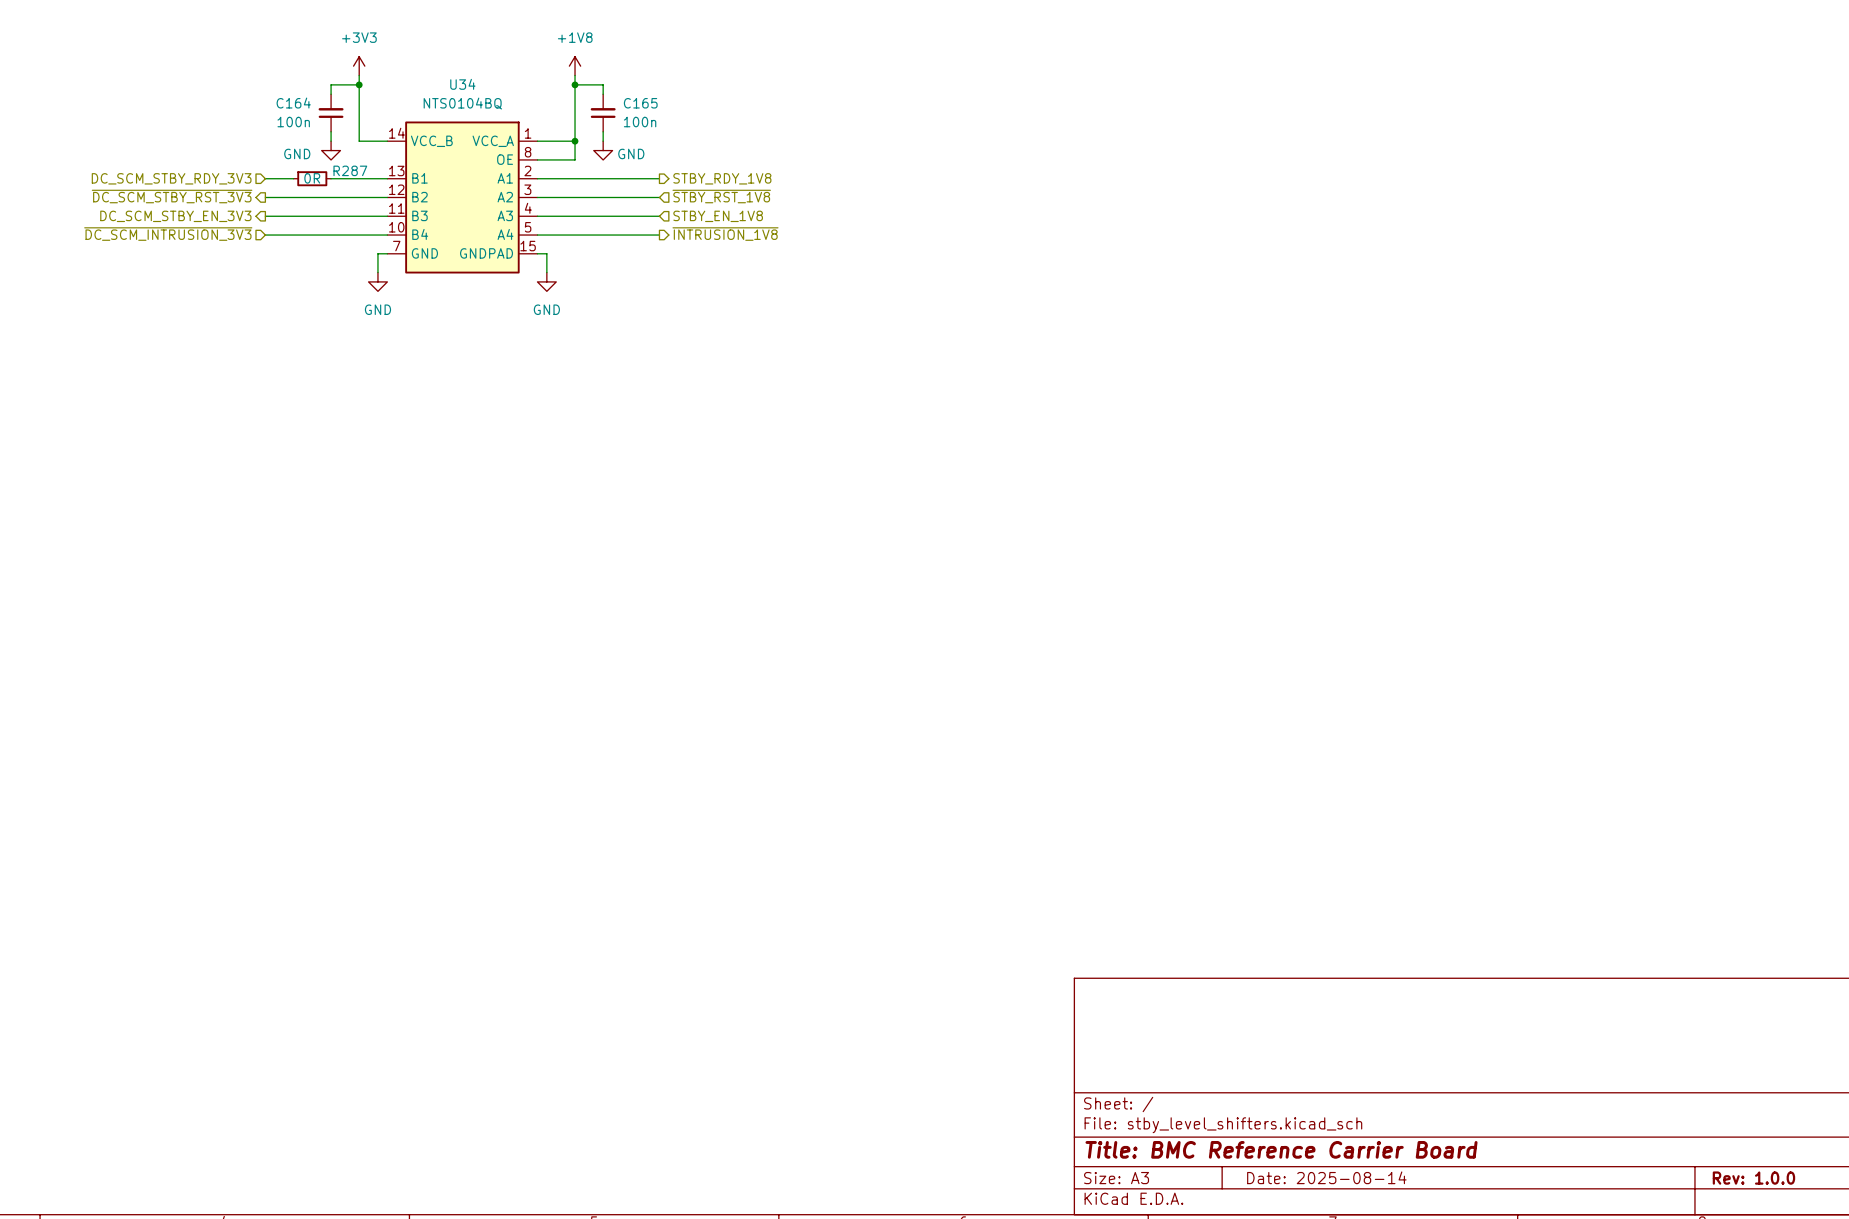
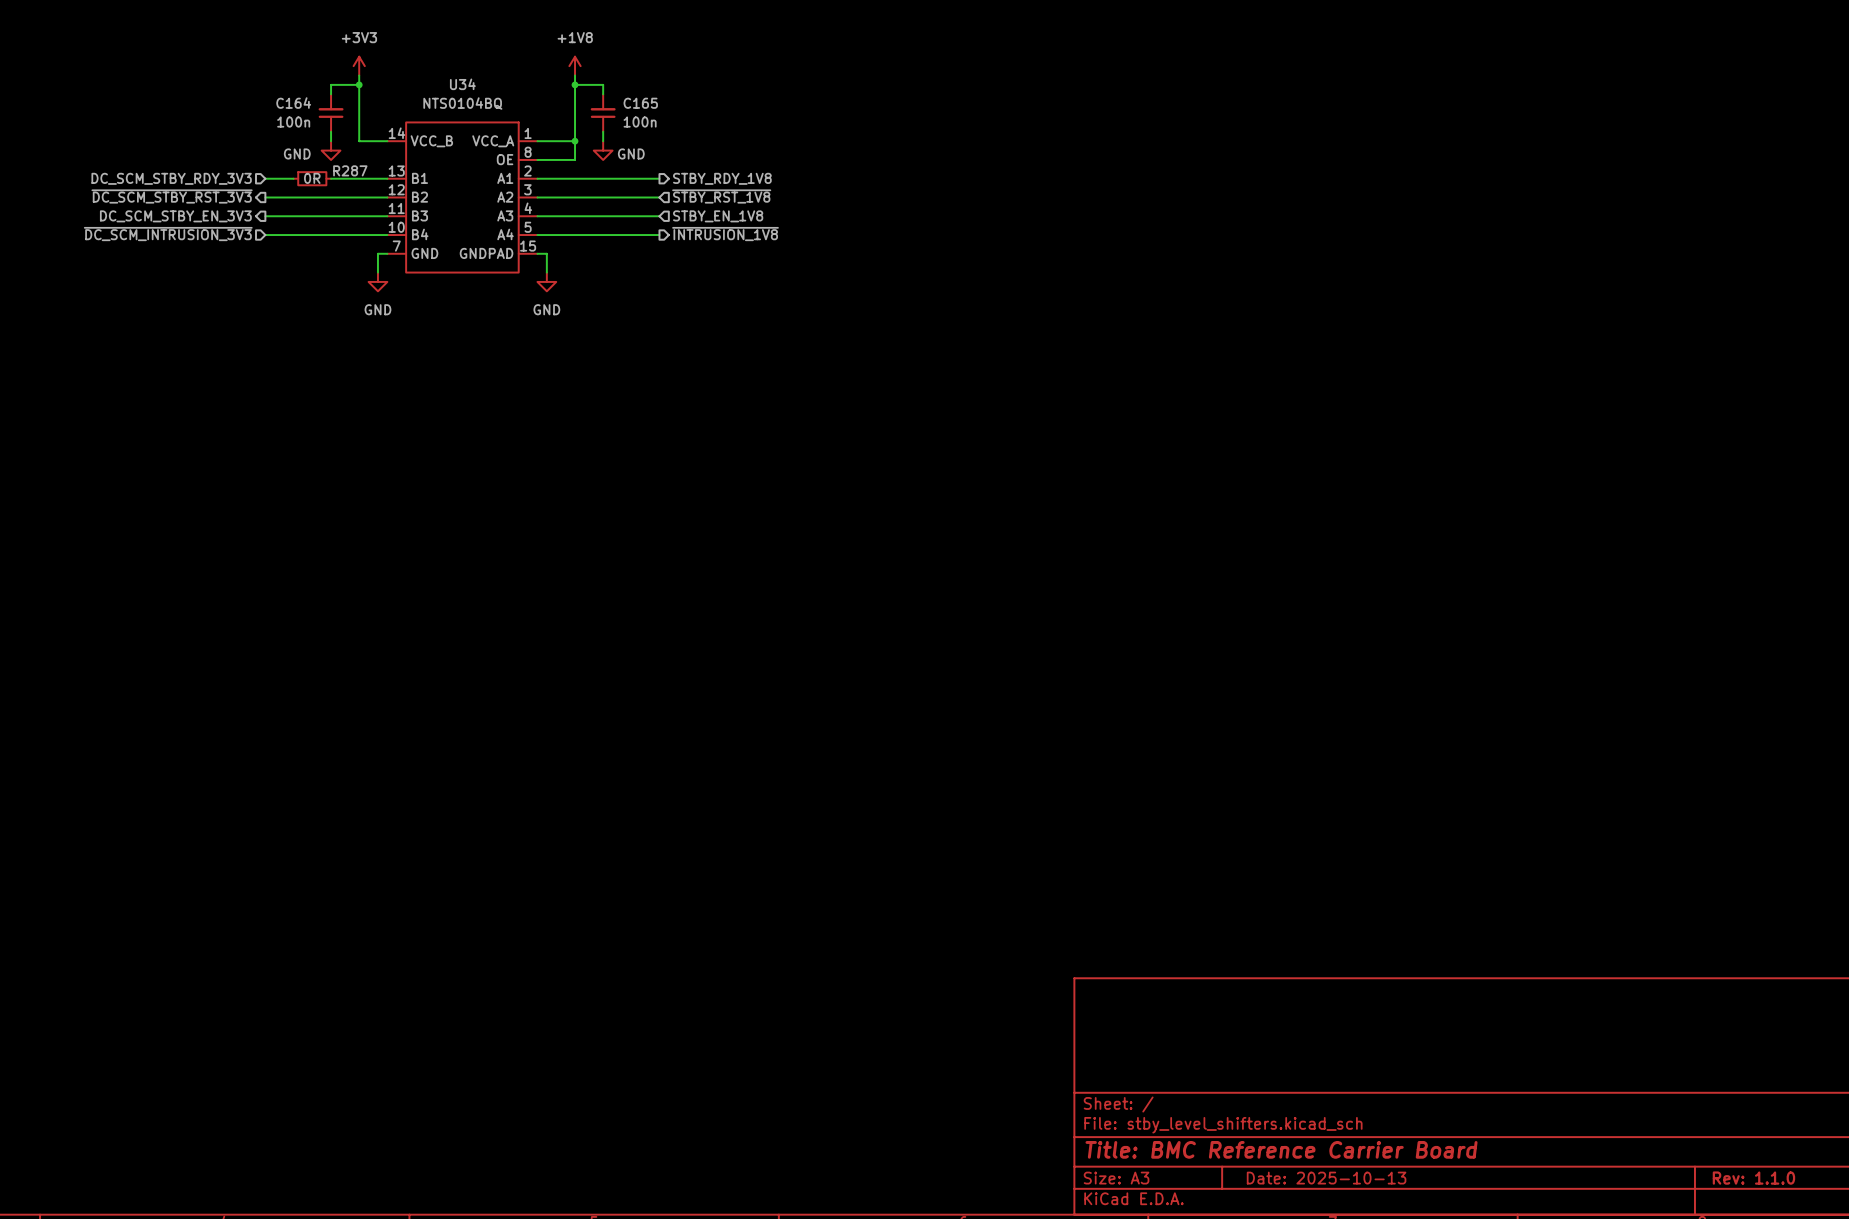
title block: Date: 2025-08-14 (1326, 1177) -> Date: 2025-10-13 (1326, 1178)
title block: Rev: 1.0.0 (1753, 1178) -> Rev: 1.1.0 (1753, 1178)

